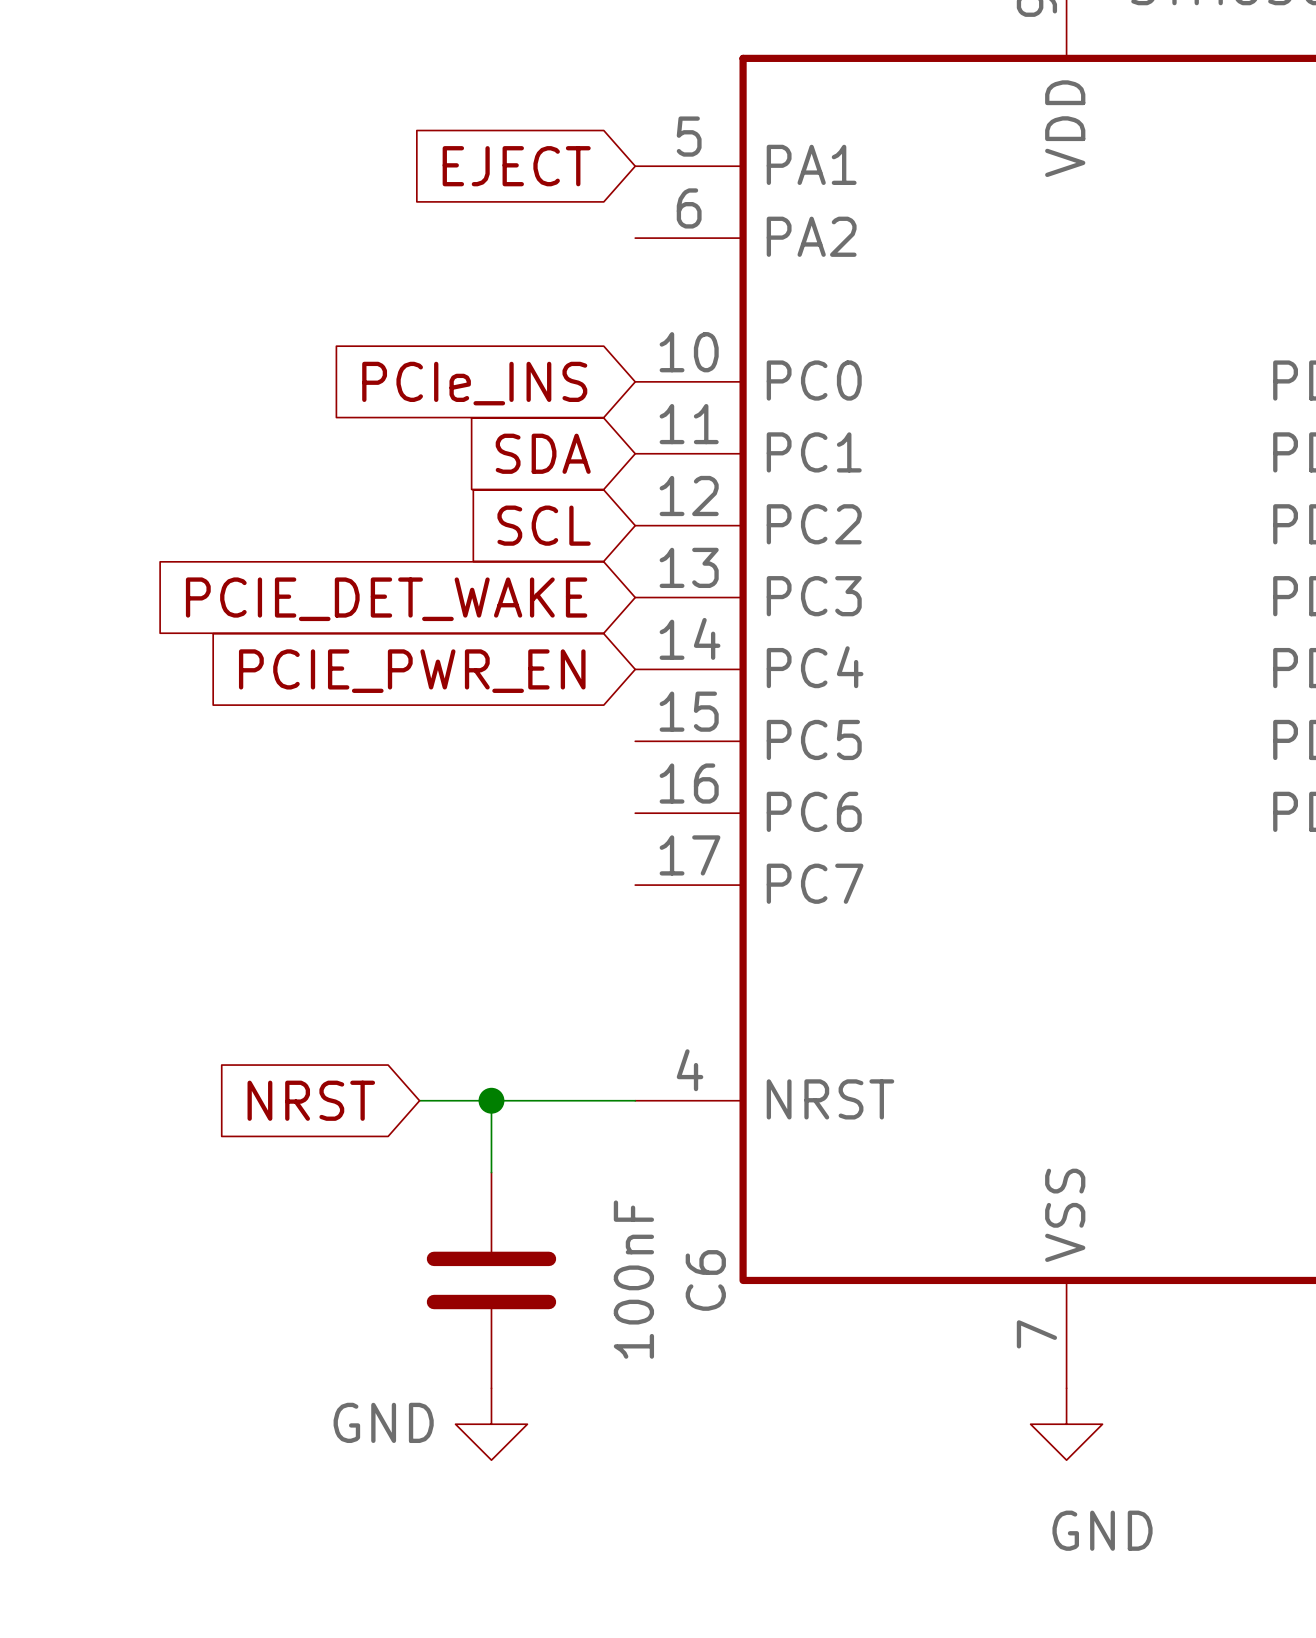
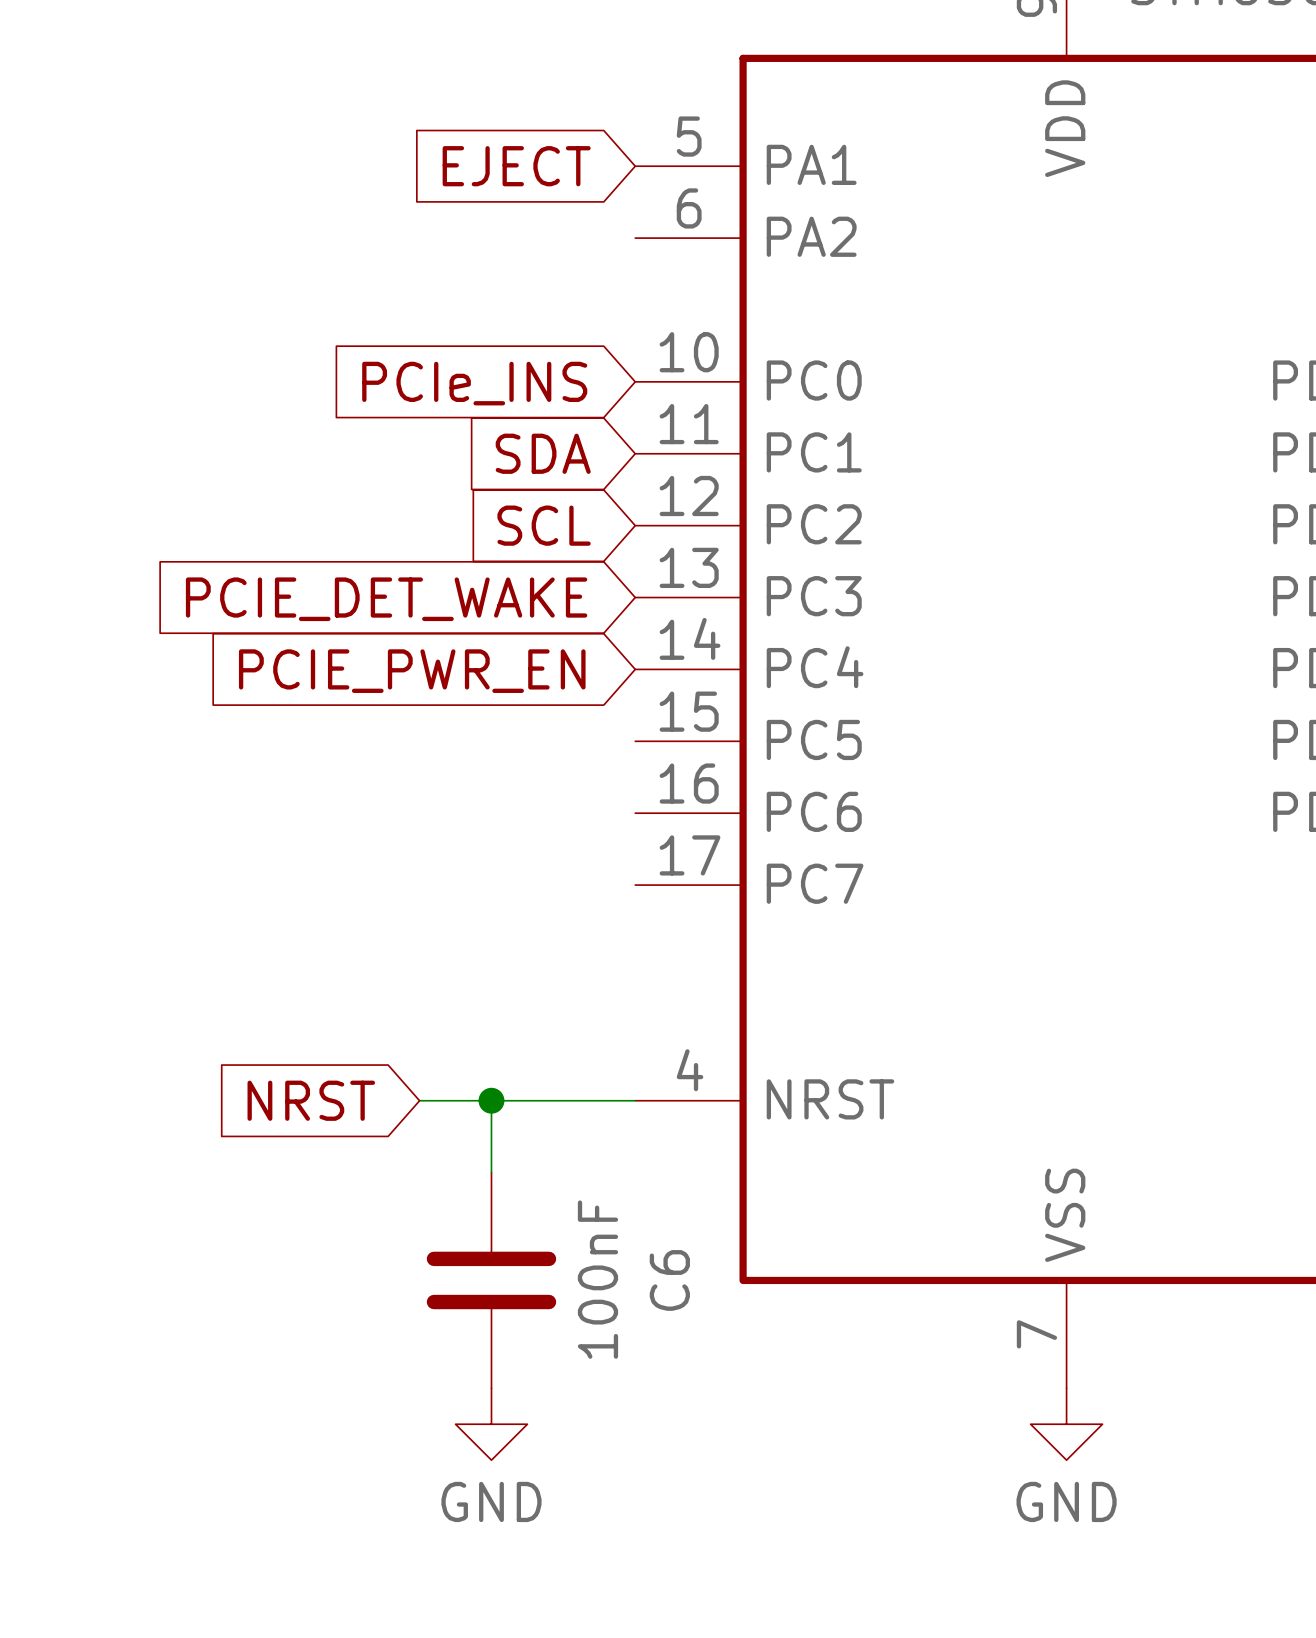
C6 value position: 100nF (633, 1279) -> 100nF (597, 1279)
C6 name position: C6 (705, 1280) -> C6 (669, 1280)
power symbol text position: GND (383, 1422) -> GND (491, 1501)
power symbol text position: GND (1102, 1530) -> GND (1066, 1501)

